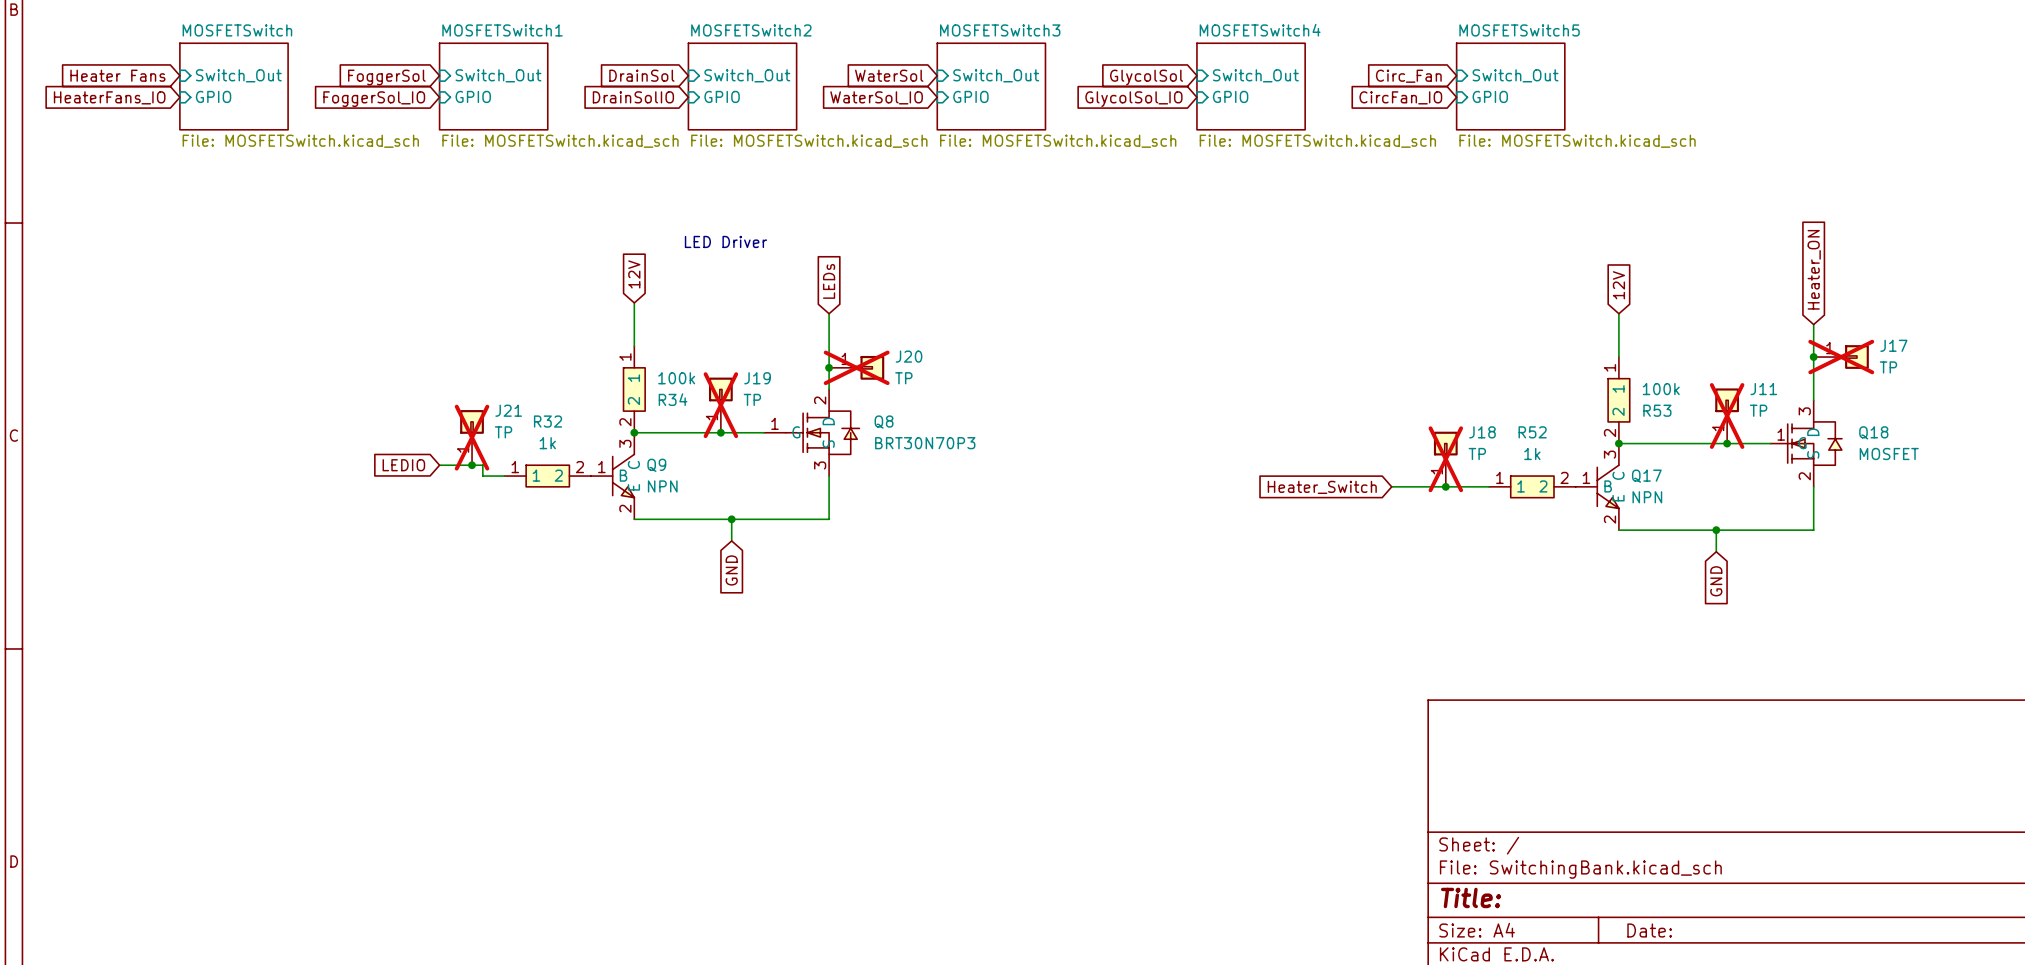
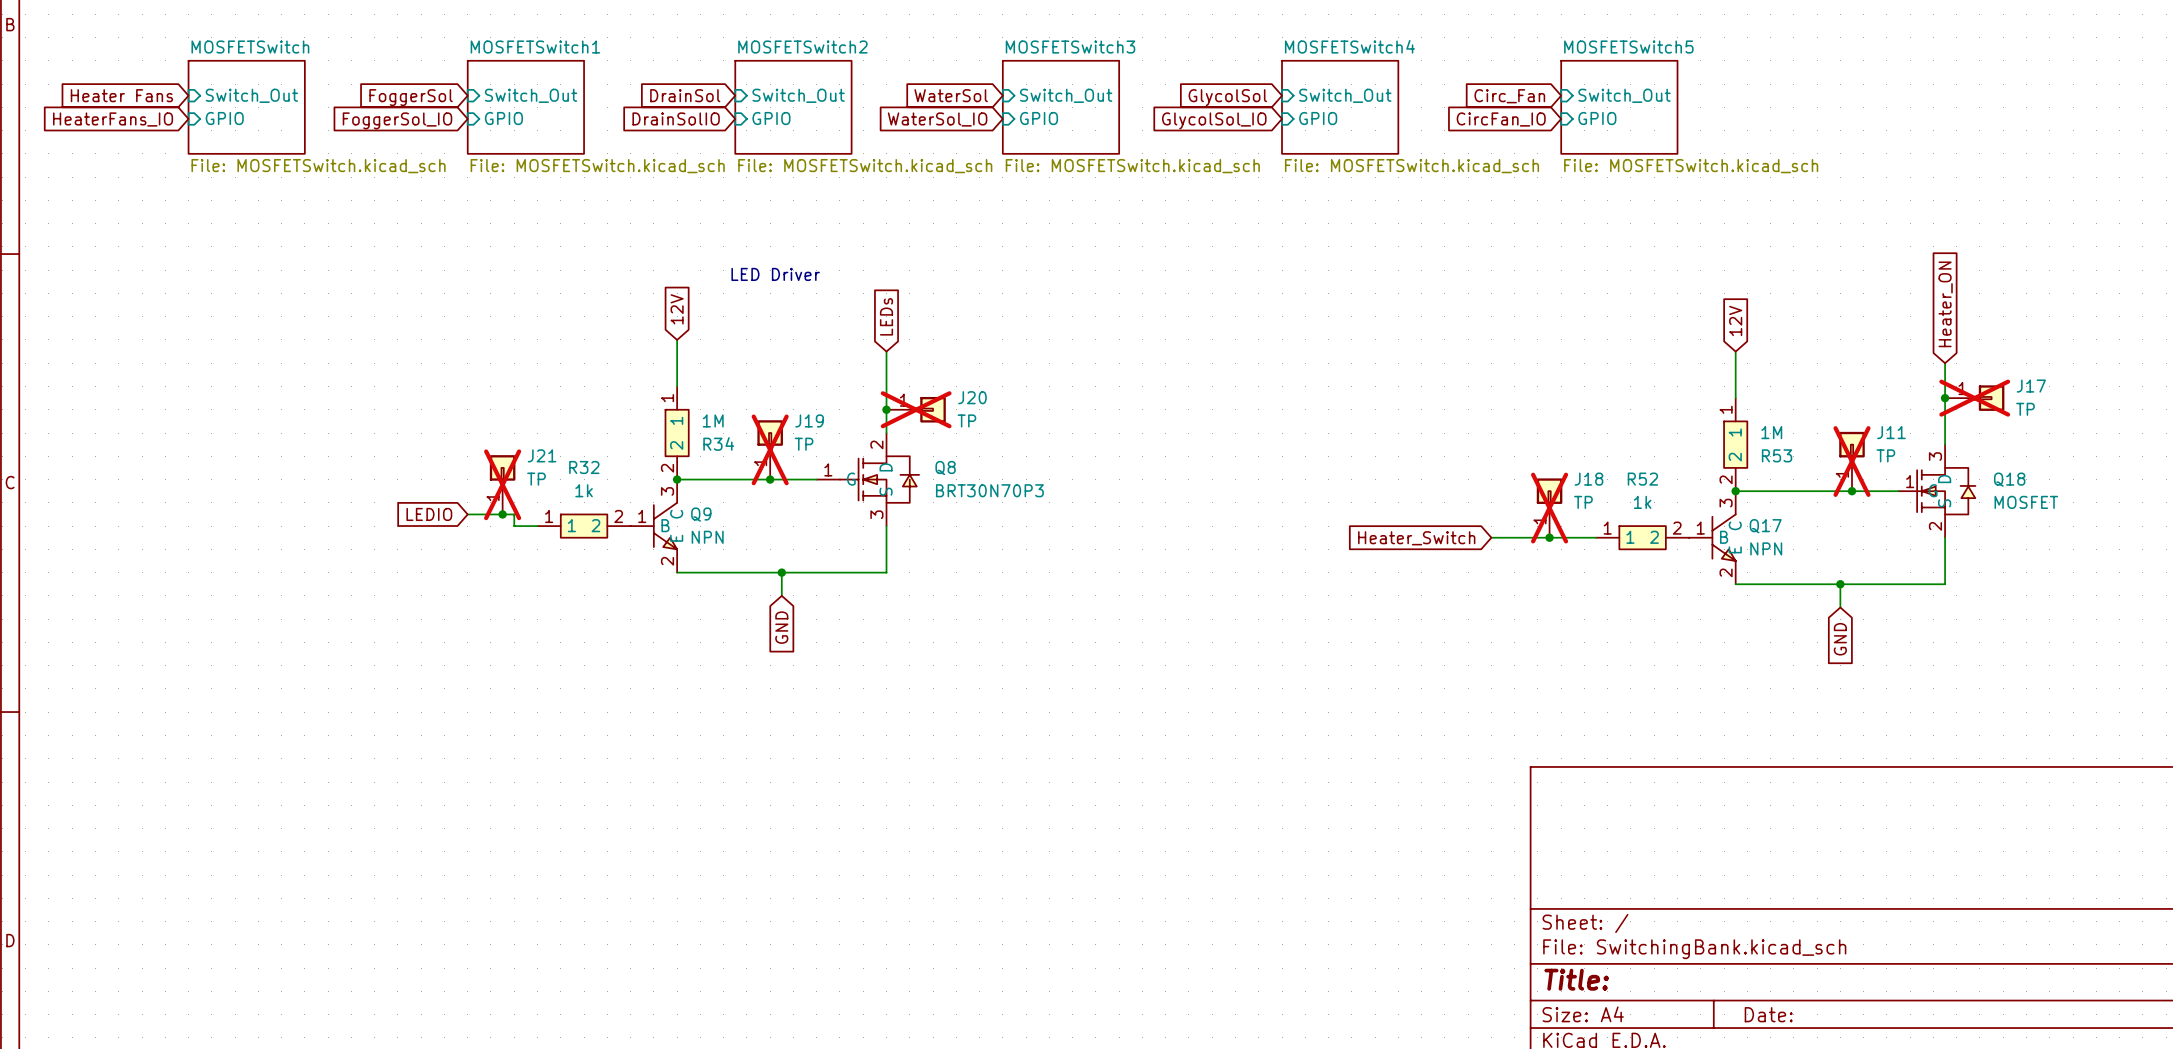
R34 value: 100k (676, 378) -> 1M (713, 420)
R53 value: 100k (1661, 389) -> 1M (1771, 432)

